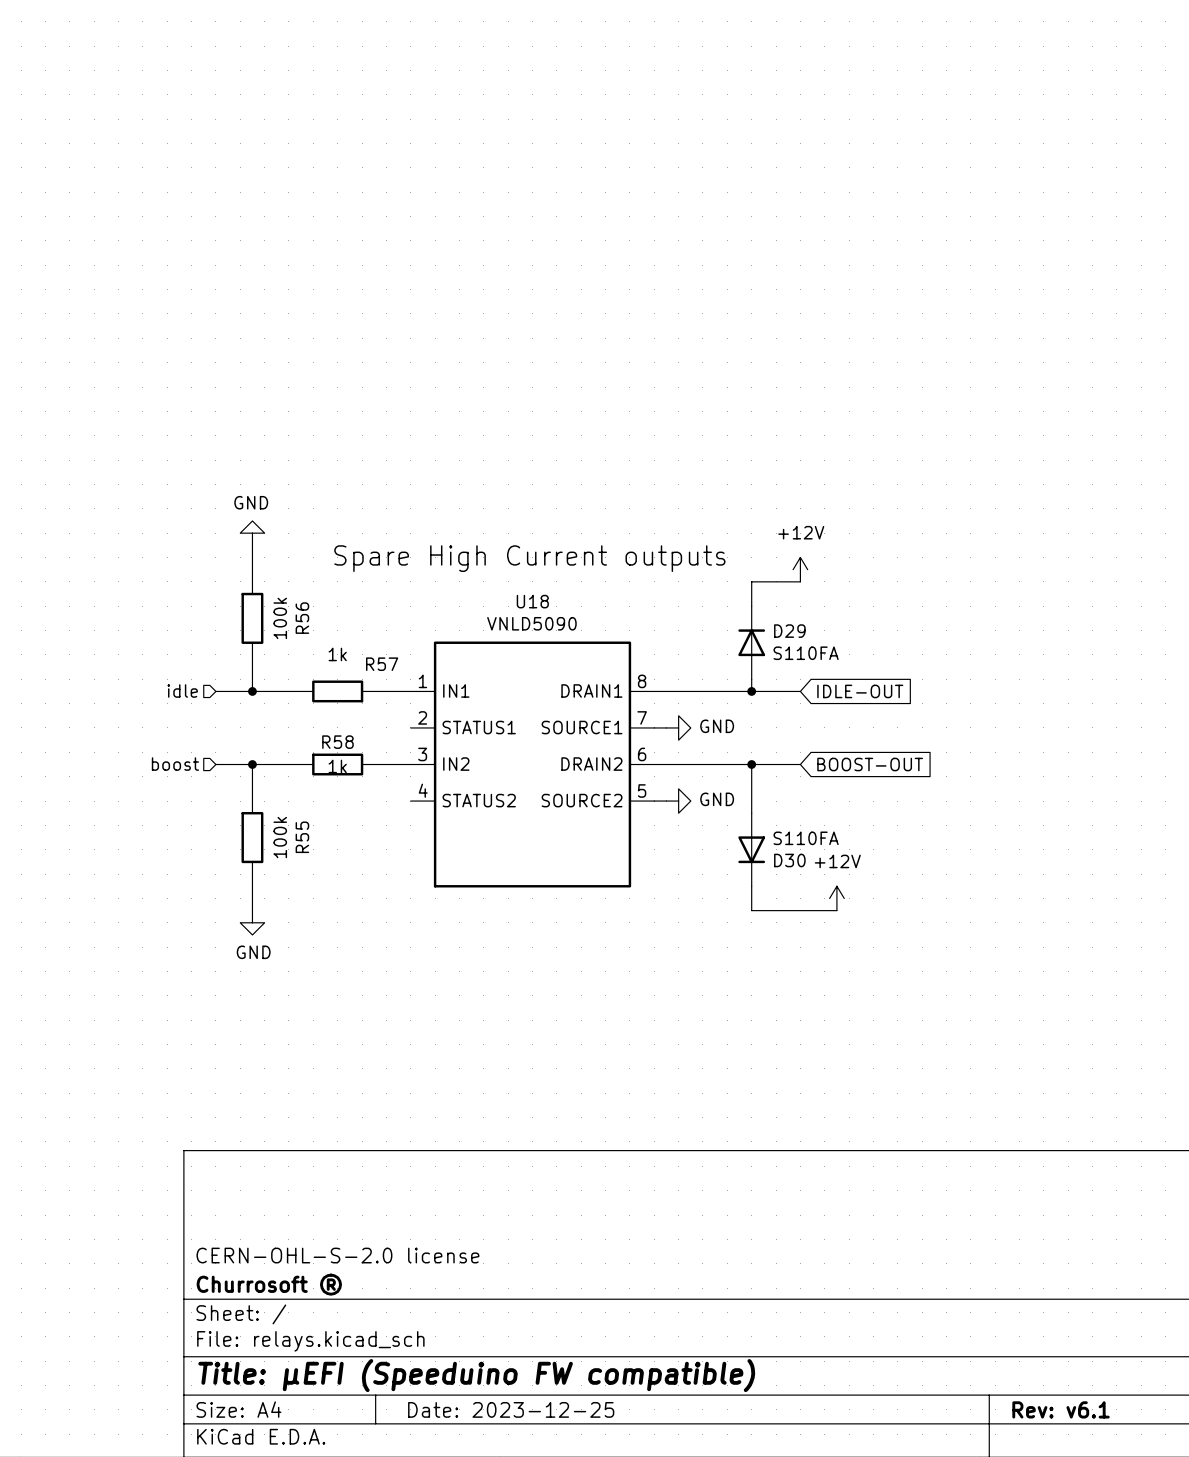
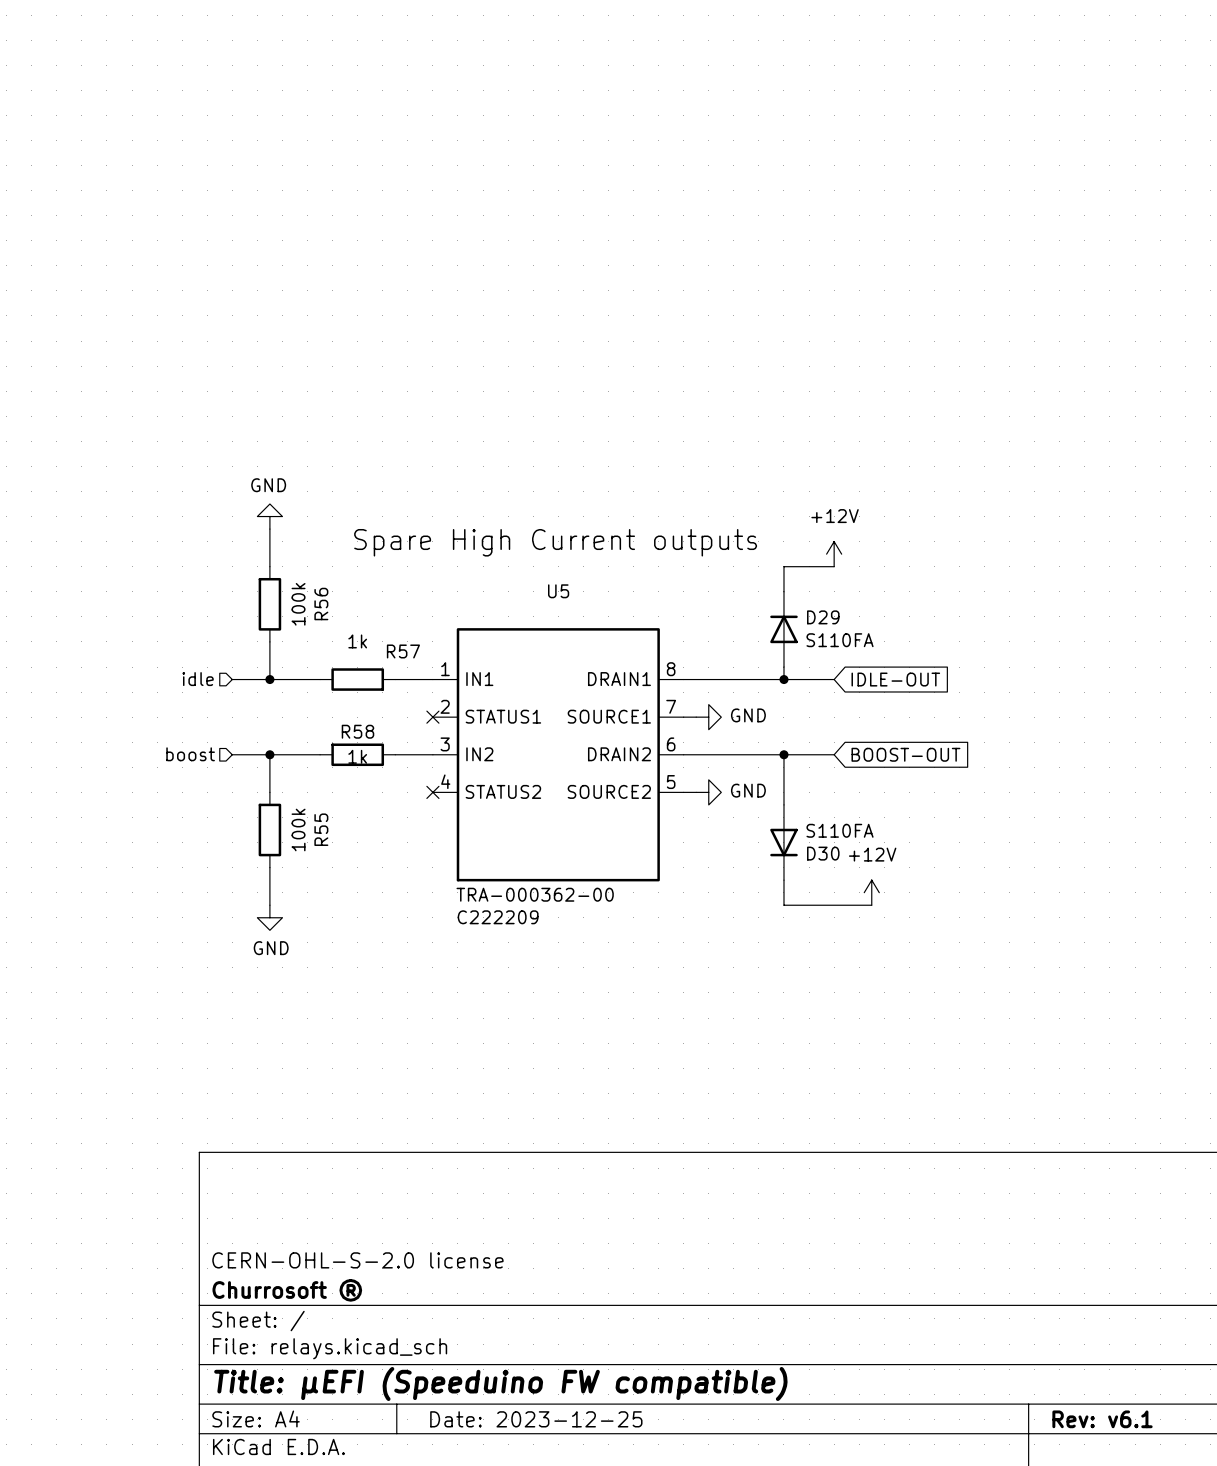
U18 name: U18 (532, 601) -> U5 (558, 591)
U18 value: VNLD5090 (531, 623) -> none
no-connect mark: none -> (432, 717)
no-connect mark: none -> (432, 792)
U18 text: none -> TRA-000362-00 (535, 894)
U18 text: none -> C222209 (498, 917)

